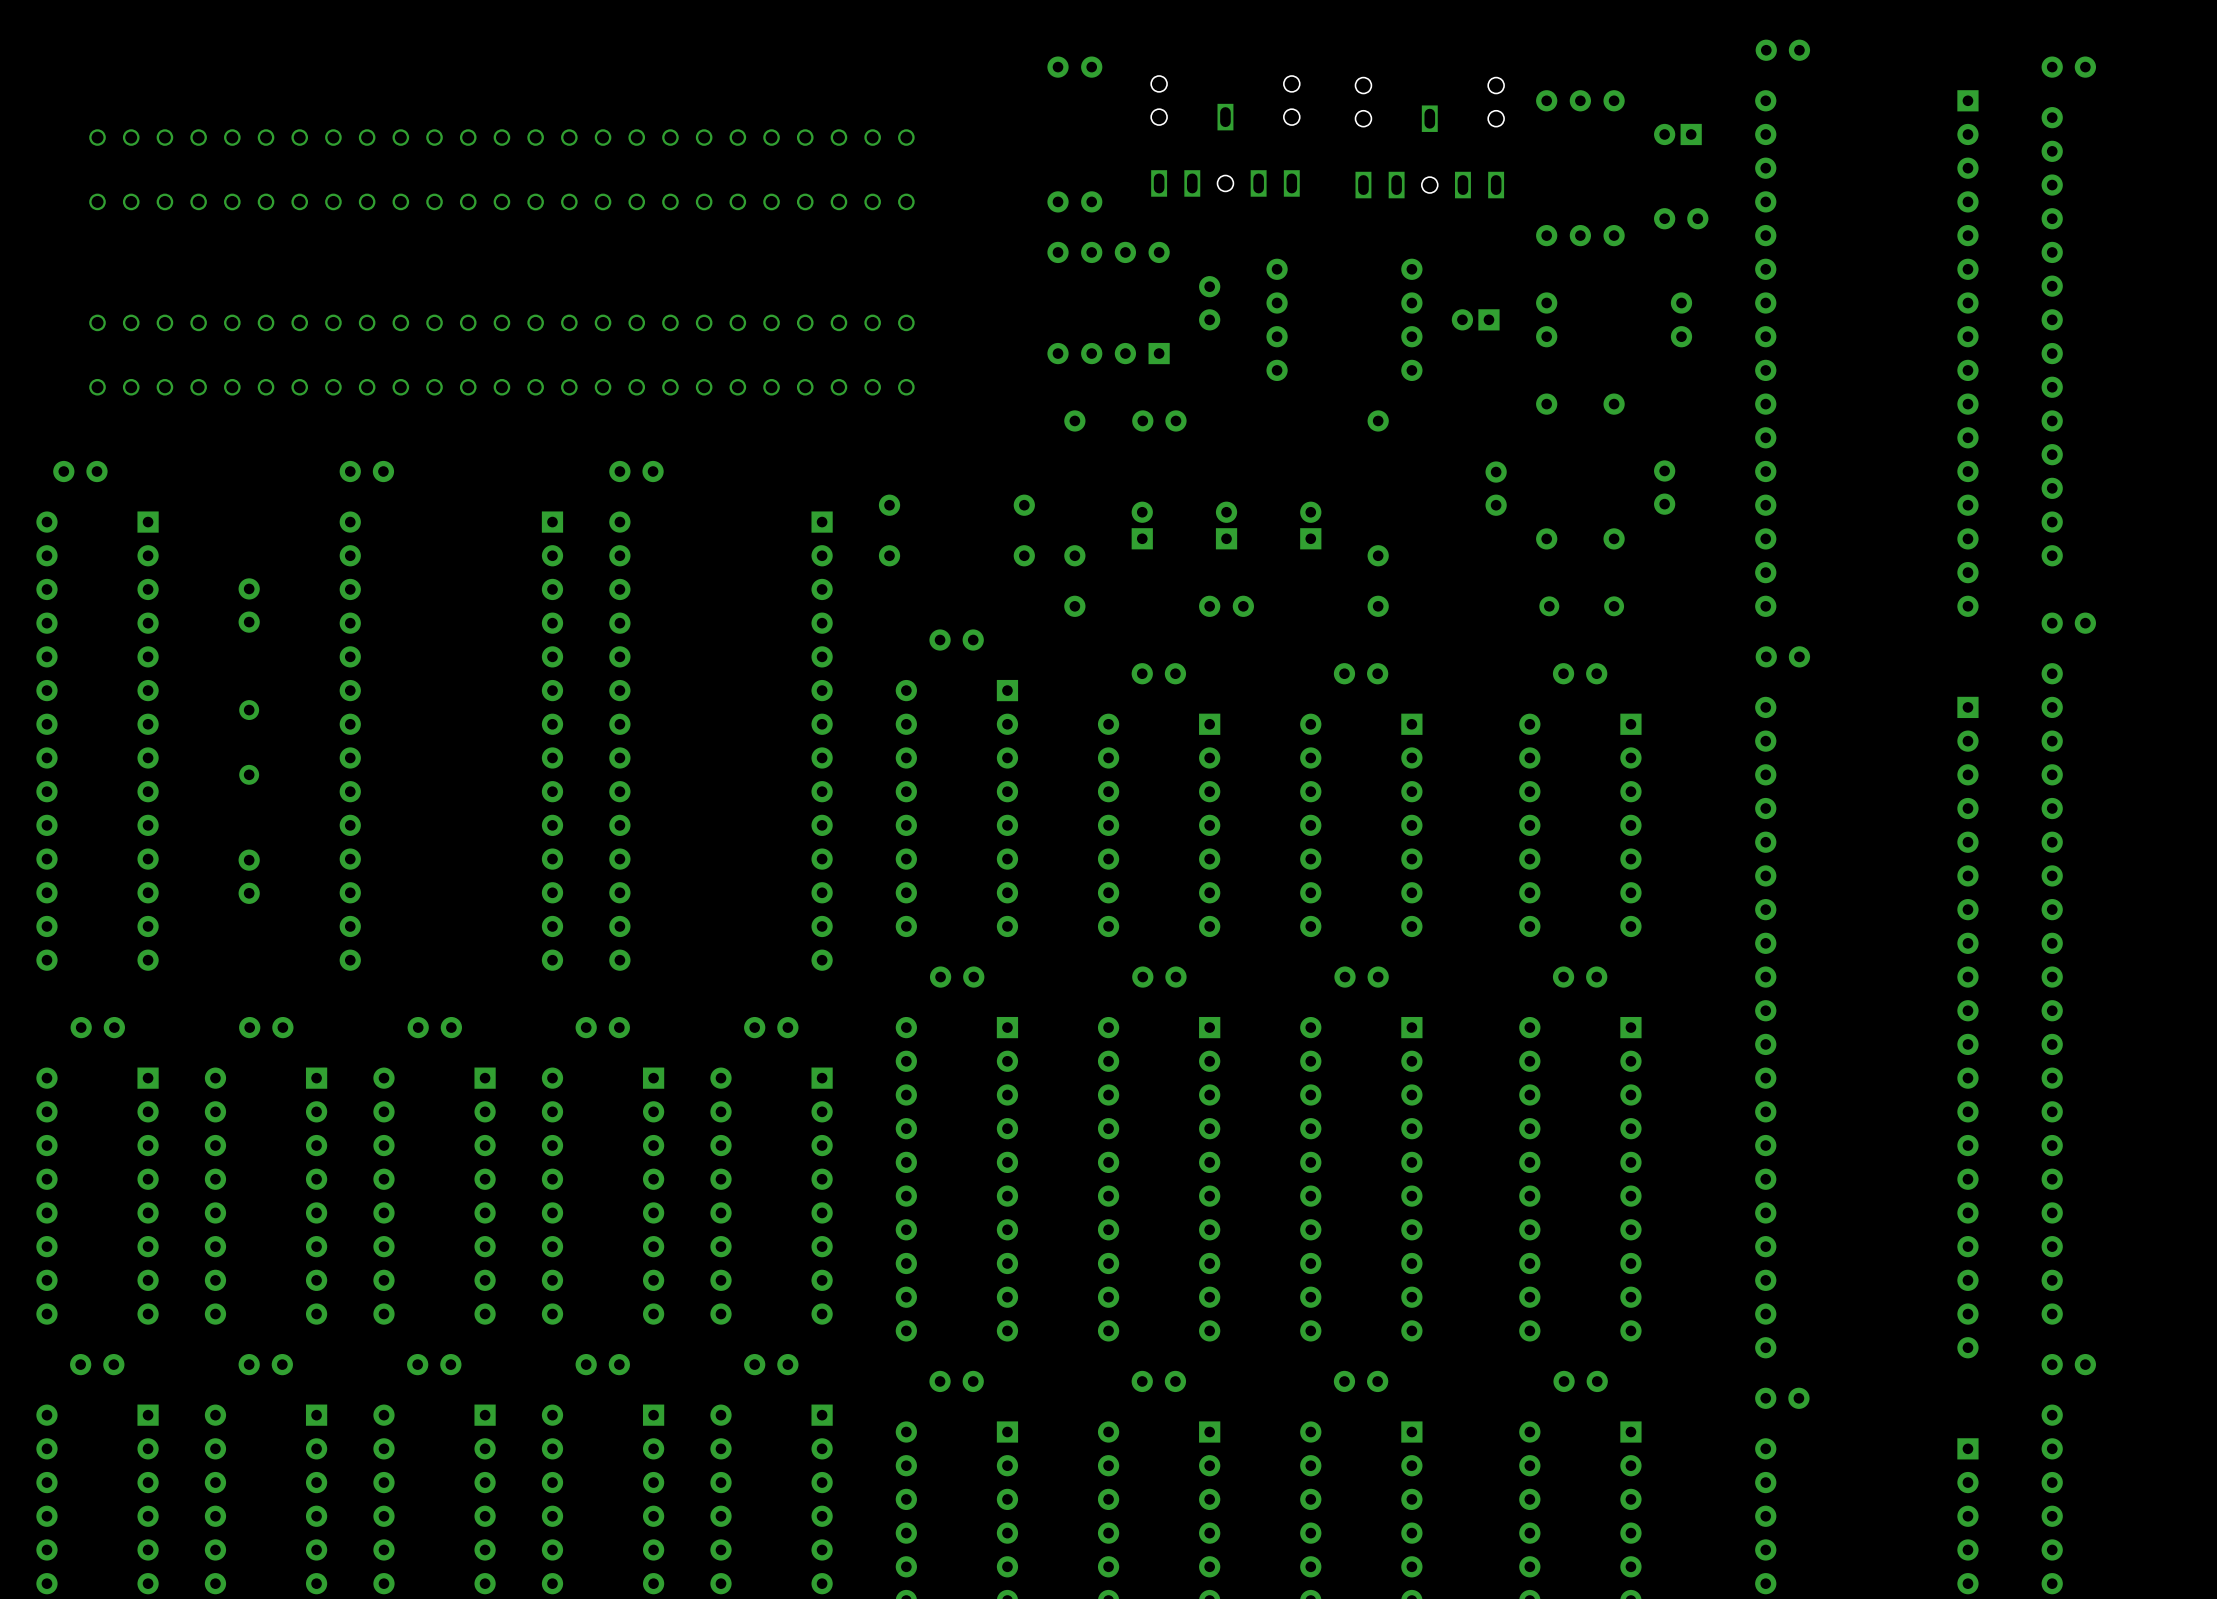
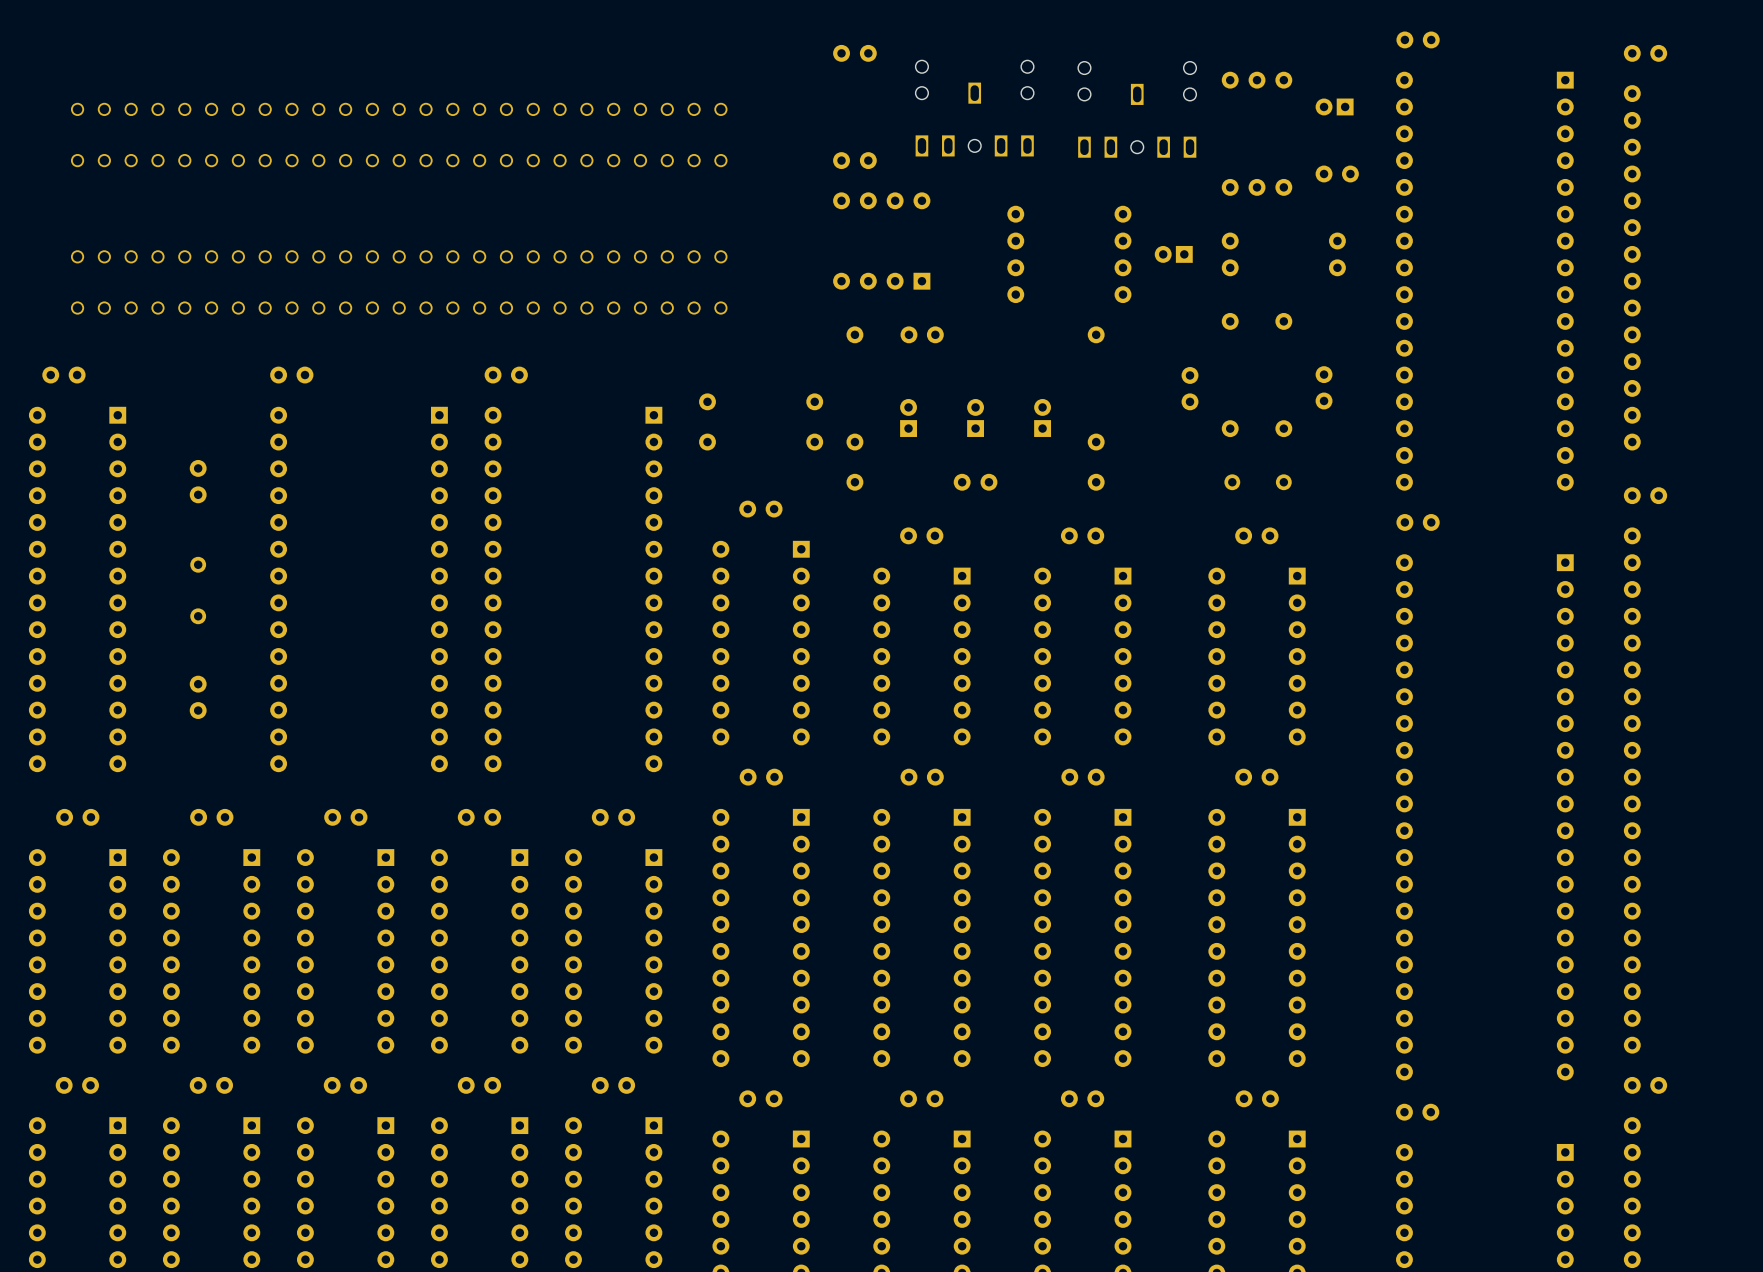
part: (1209, 303) -> none

